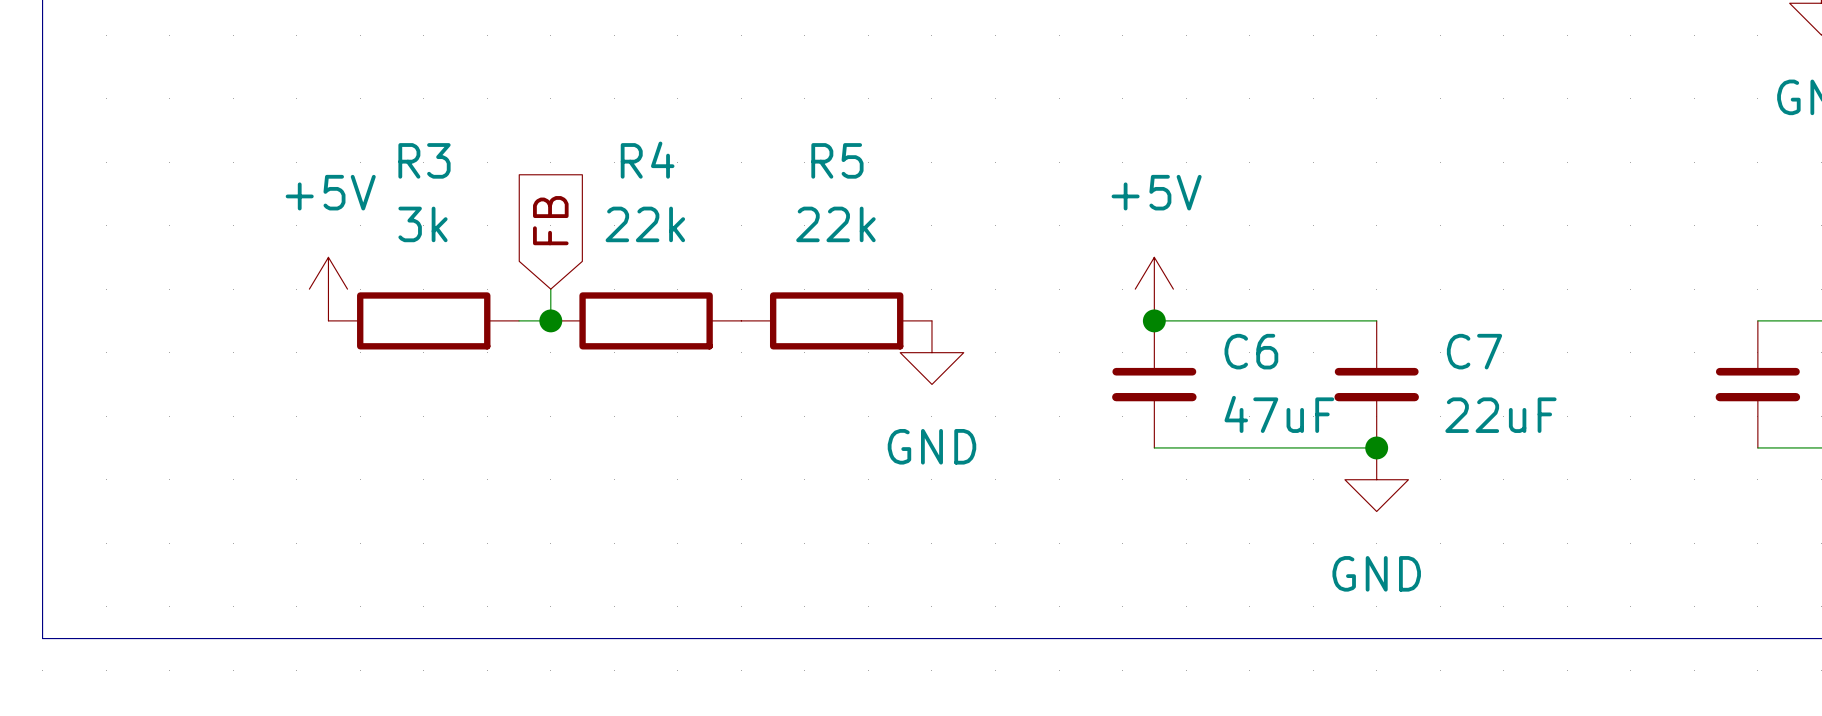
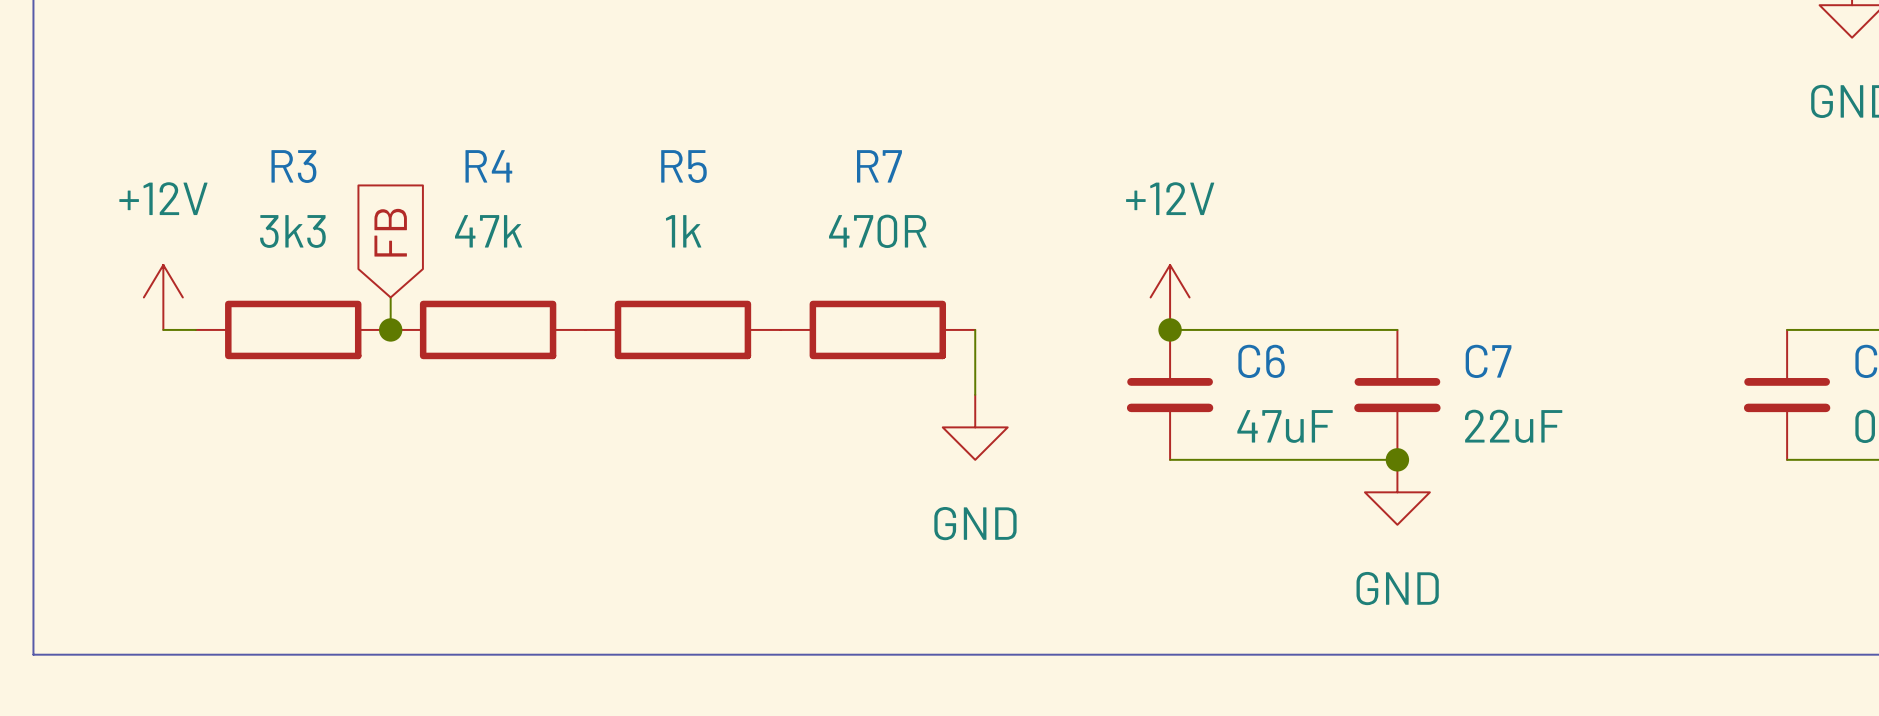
global label position: FB (550, 220) -> FB (390, 232)
R3 value: 3k (422, 224) -> 3k3 (292, 231)
R4 value: 22k (645, 224) -> 47k (488, 231)
R5 value: 22k (835, 224) -> 1k (683, 231)
power symbol: none -> +12V (163, 297)
power symbol: +5V (328, 289) -> none
wire: none -> (390, 297) (390, 329)
wire: (550, 289) (550, 320) (519, 320) -> none
power symbol: +5V (1154, 289) -> +12V (1170, 297)
wire: none -> (163, 329) (195, 329)
junction: none -> (390, 329)
R3 position: (423, 320) -> (293, 329)
junction: (550, 320) -> none
R4 position: (646, 320) -> (488, 329)
R5 position: (836, 320) -> (682, 329)
R7: none -> 470R (877, 329)
wire: none -> (975, 329) (975, 394)
power symbol position: GND (931, 352) -> GND (975, 427)

